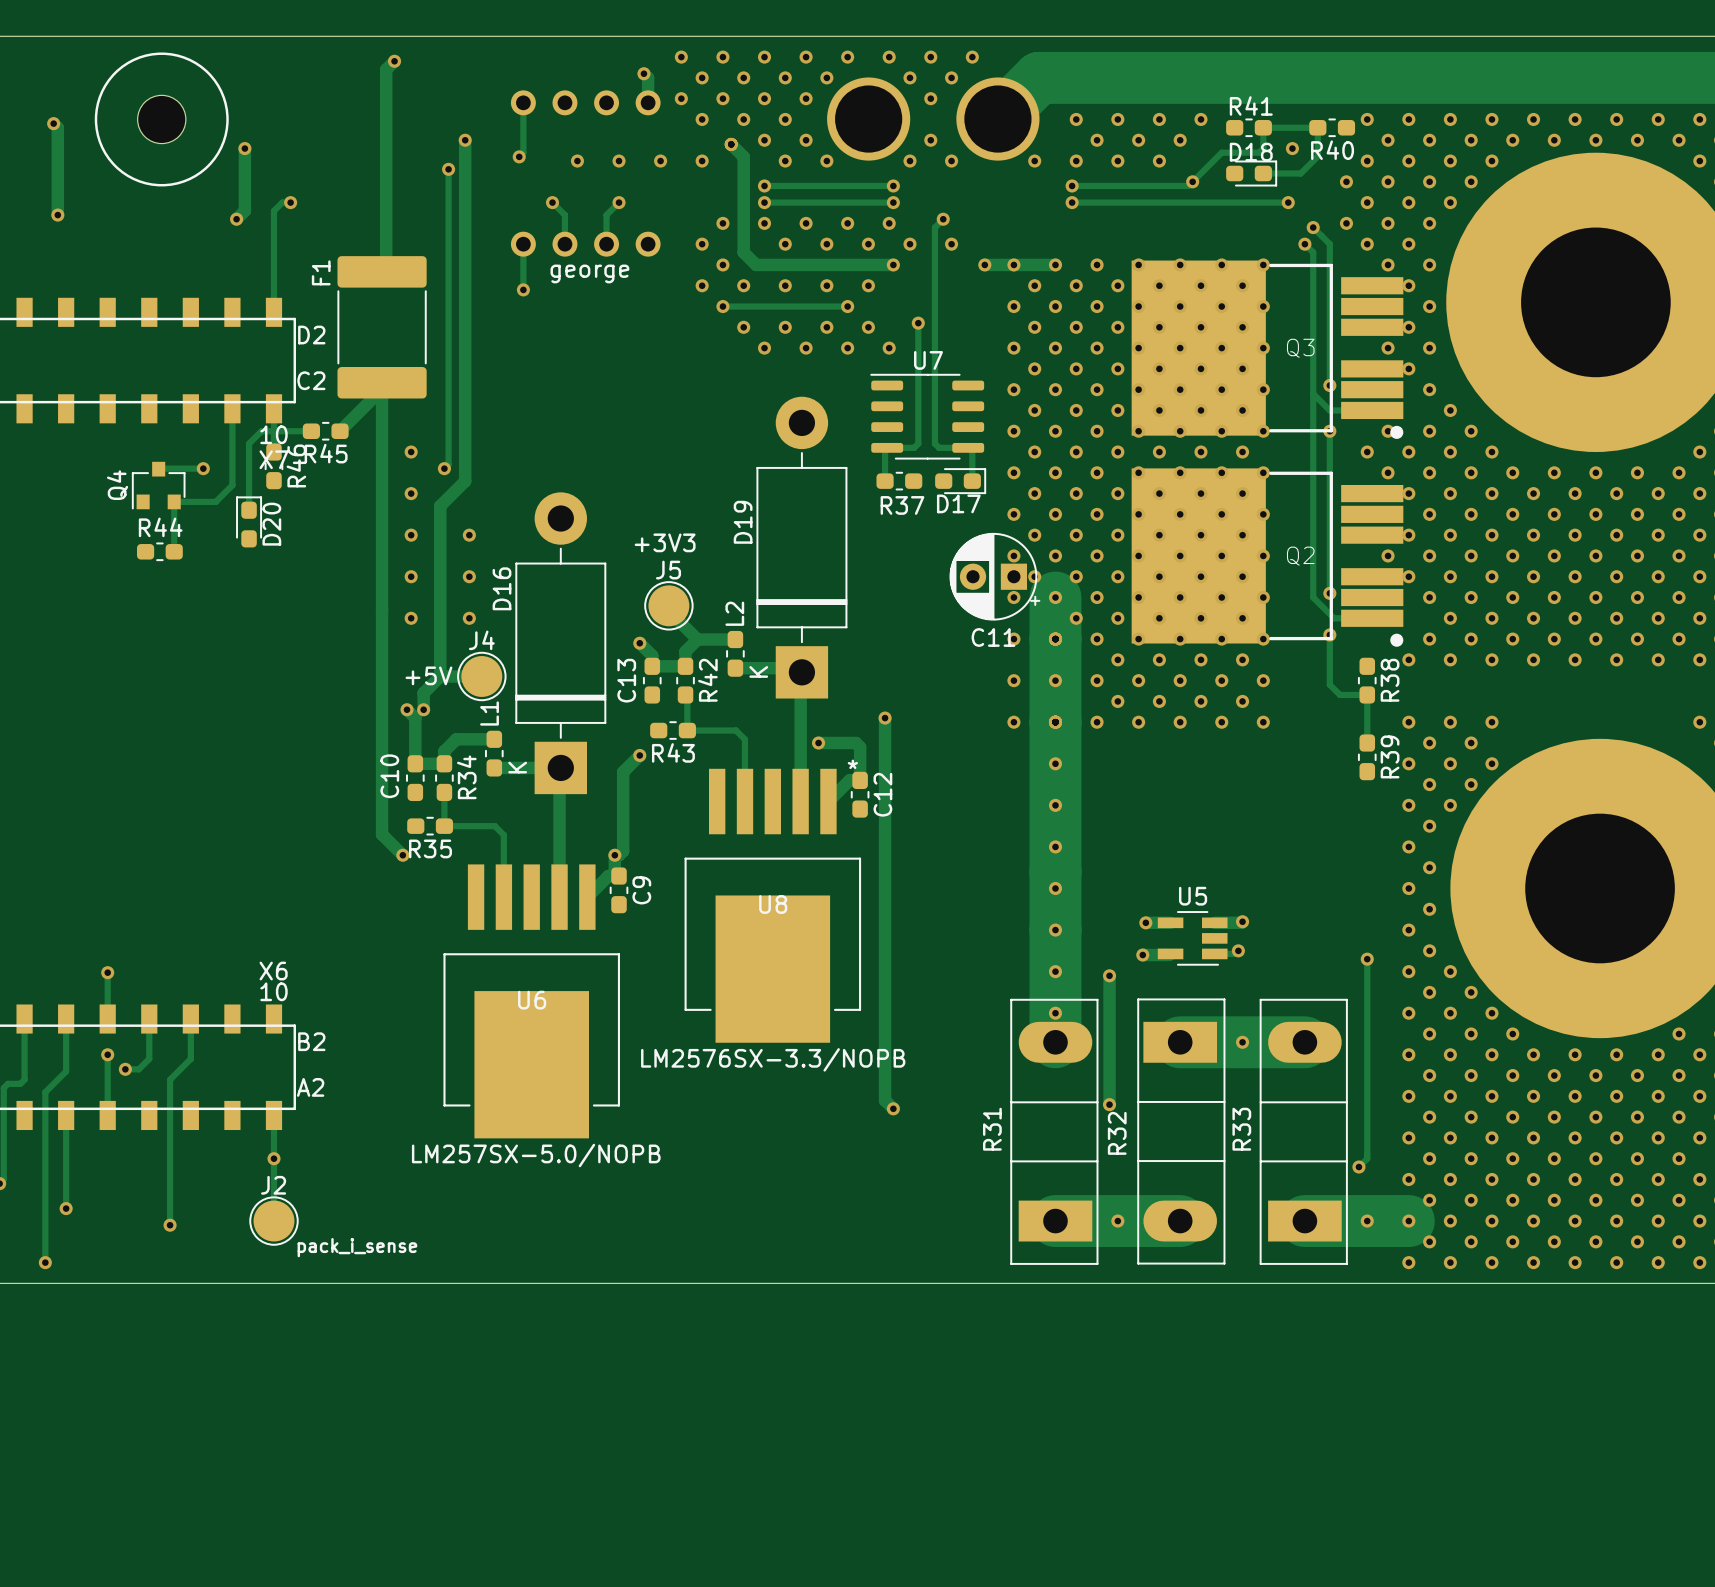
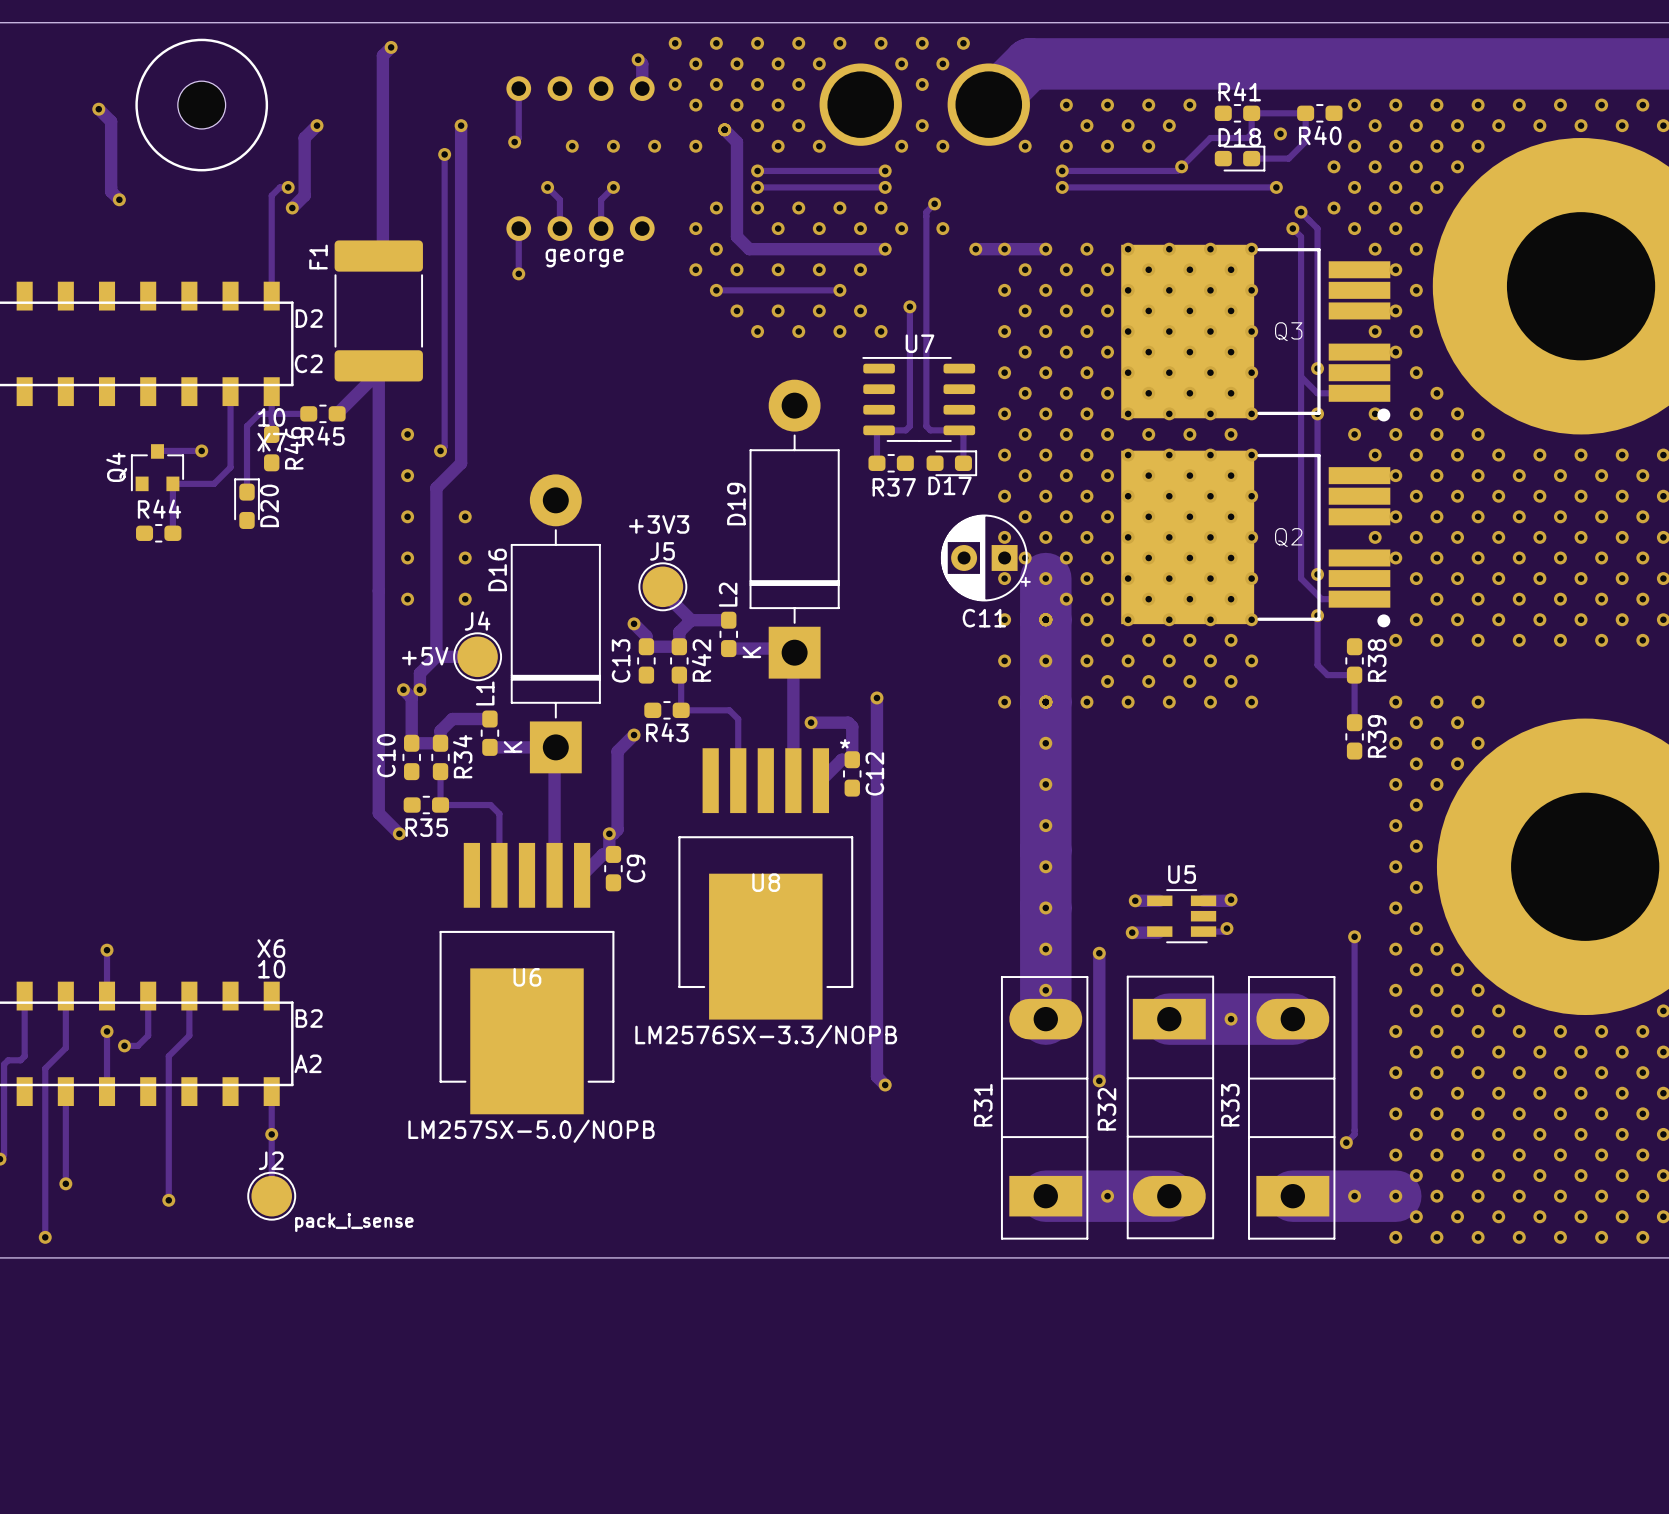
part position: (161, 119) -> (201, 105)
track: (53, 123) (57, 127) (57, 215) -> none
via position: (53, 123) -> (98, 109)
track: none -> (98, 109) (111, 121) (111, 191) (119, 199)
track: none -> (317, 125) (304, 138) (304, 195) (292, 208)
via: none -> (317, 125)
track: (244, 148) (244, 210) (236, 219) -> none
via: (244, 148) -> none
via: (57, 215) -> none
via: none -> (119, 199)
via: (236, 219) -> none
via: none -> (292, 208)

